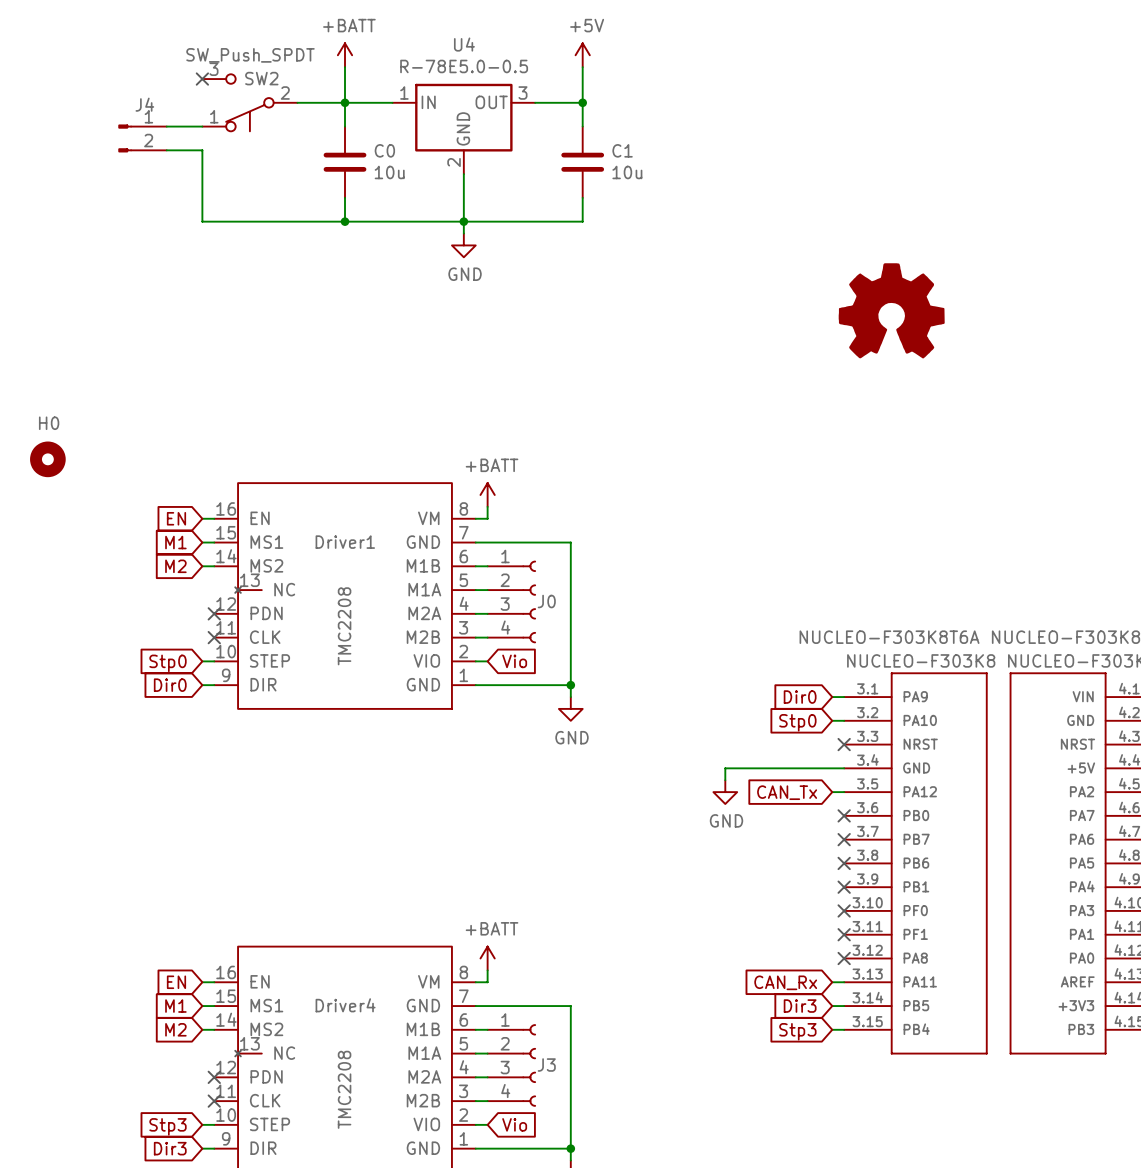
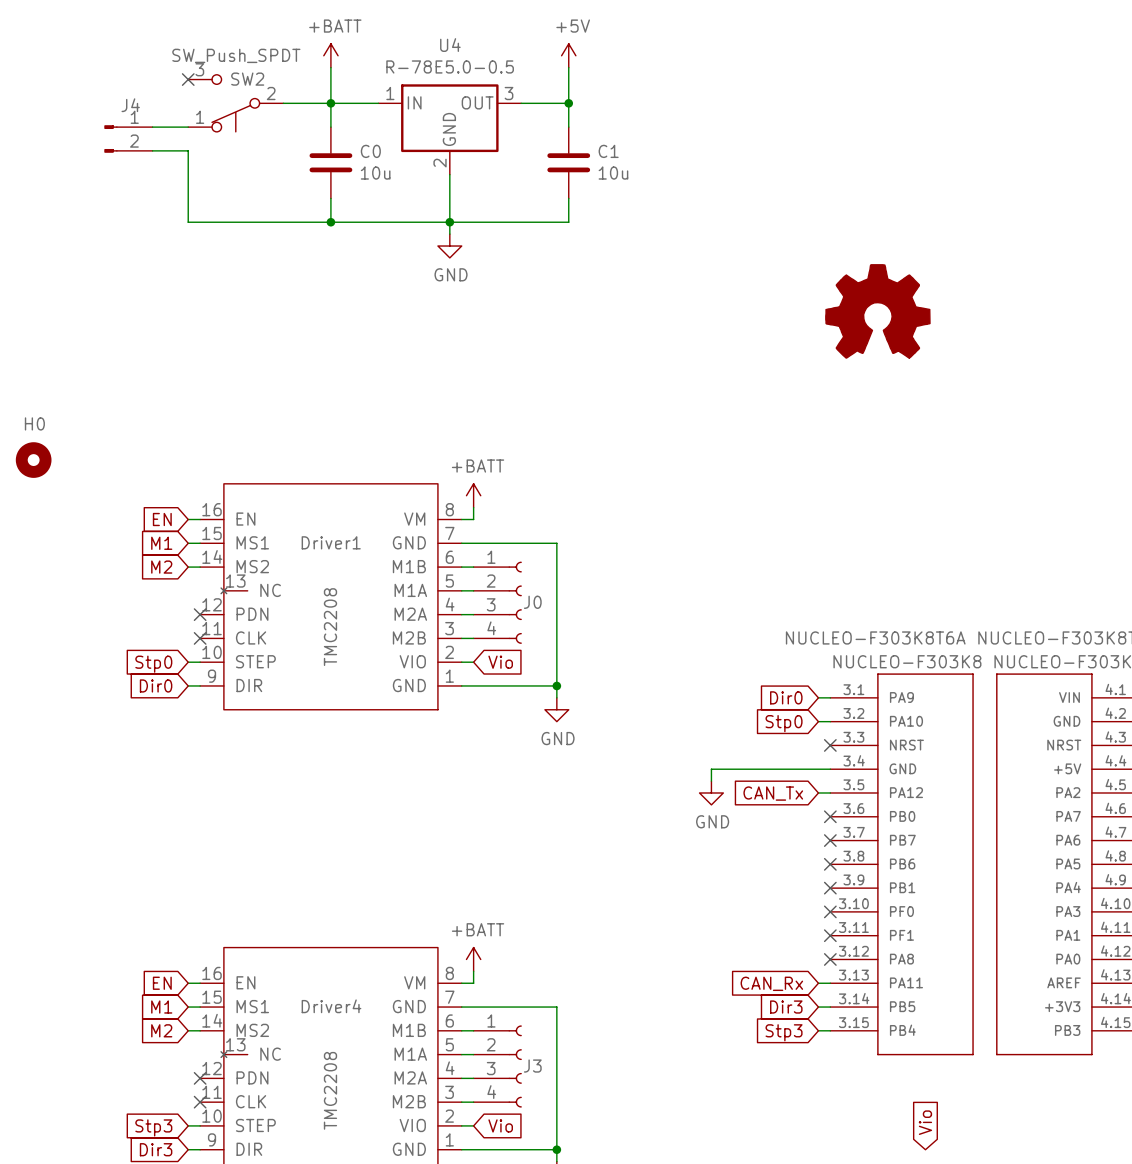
global label: none -> Vio (925, 1122)

